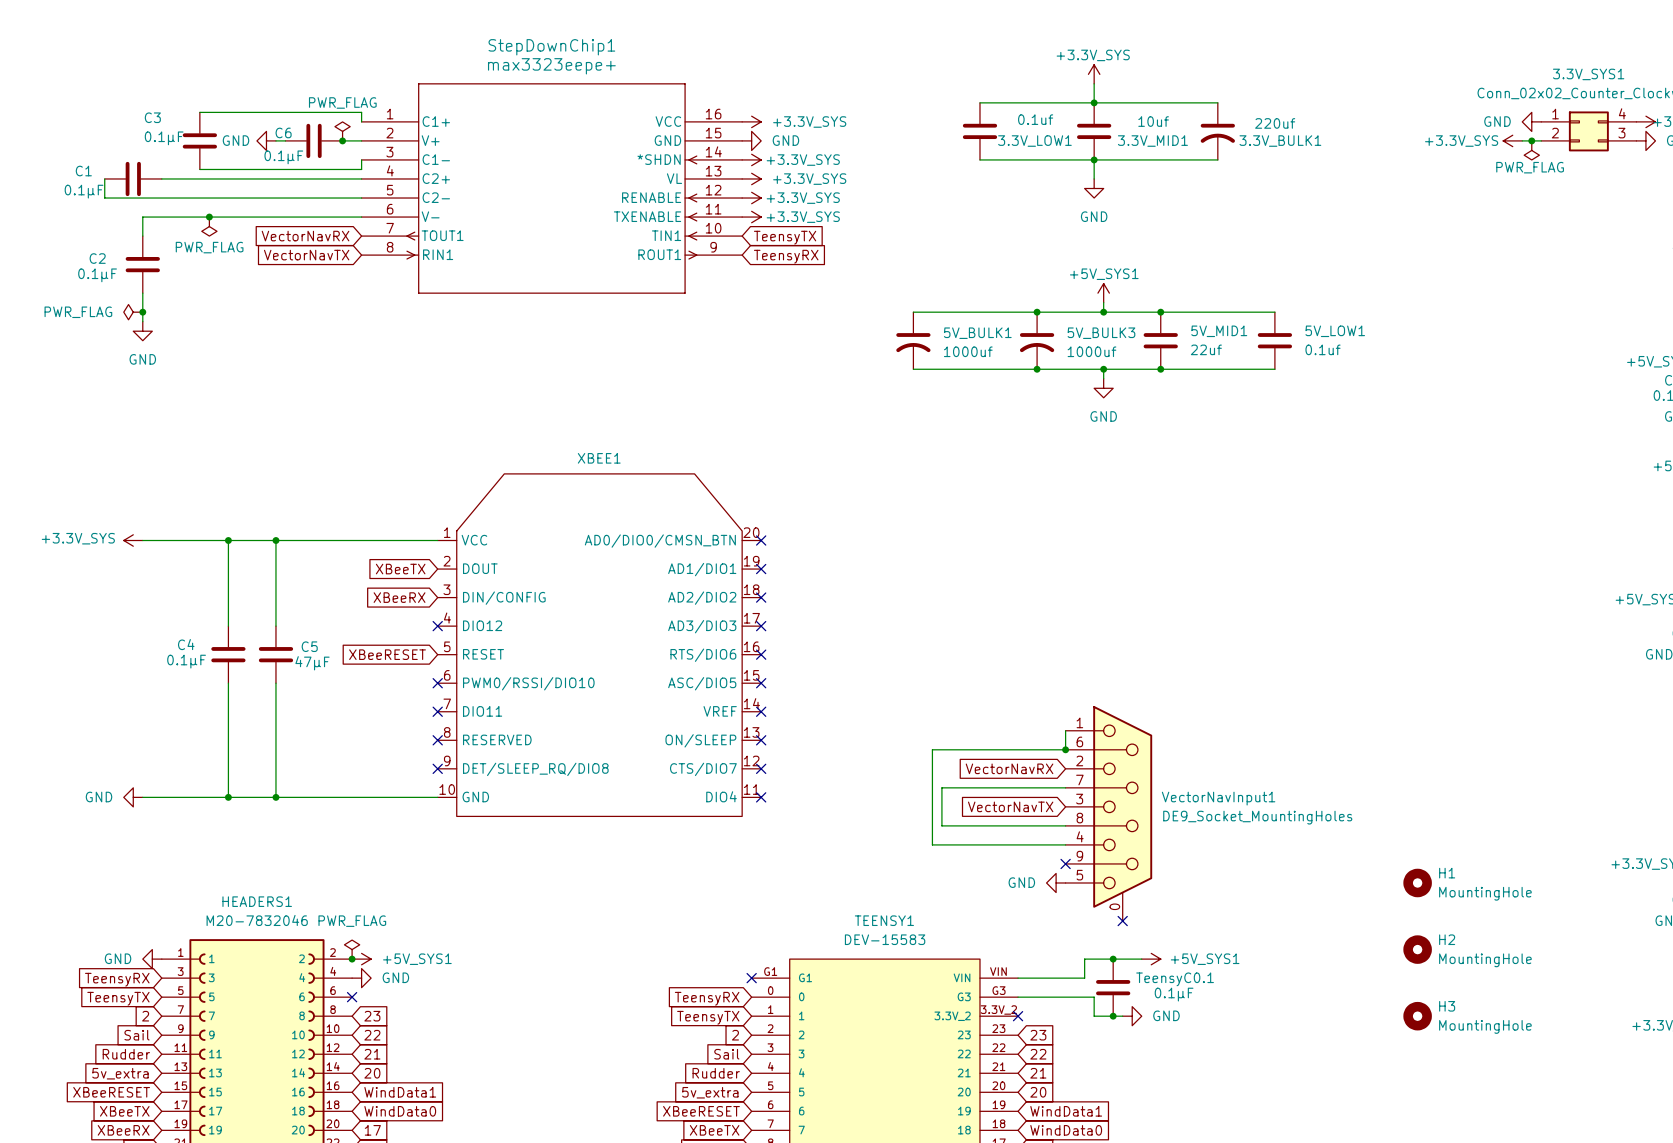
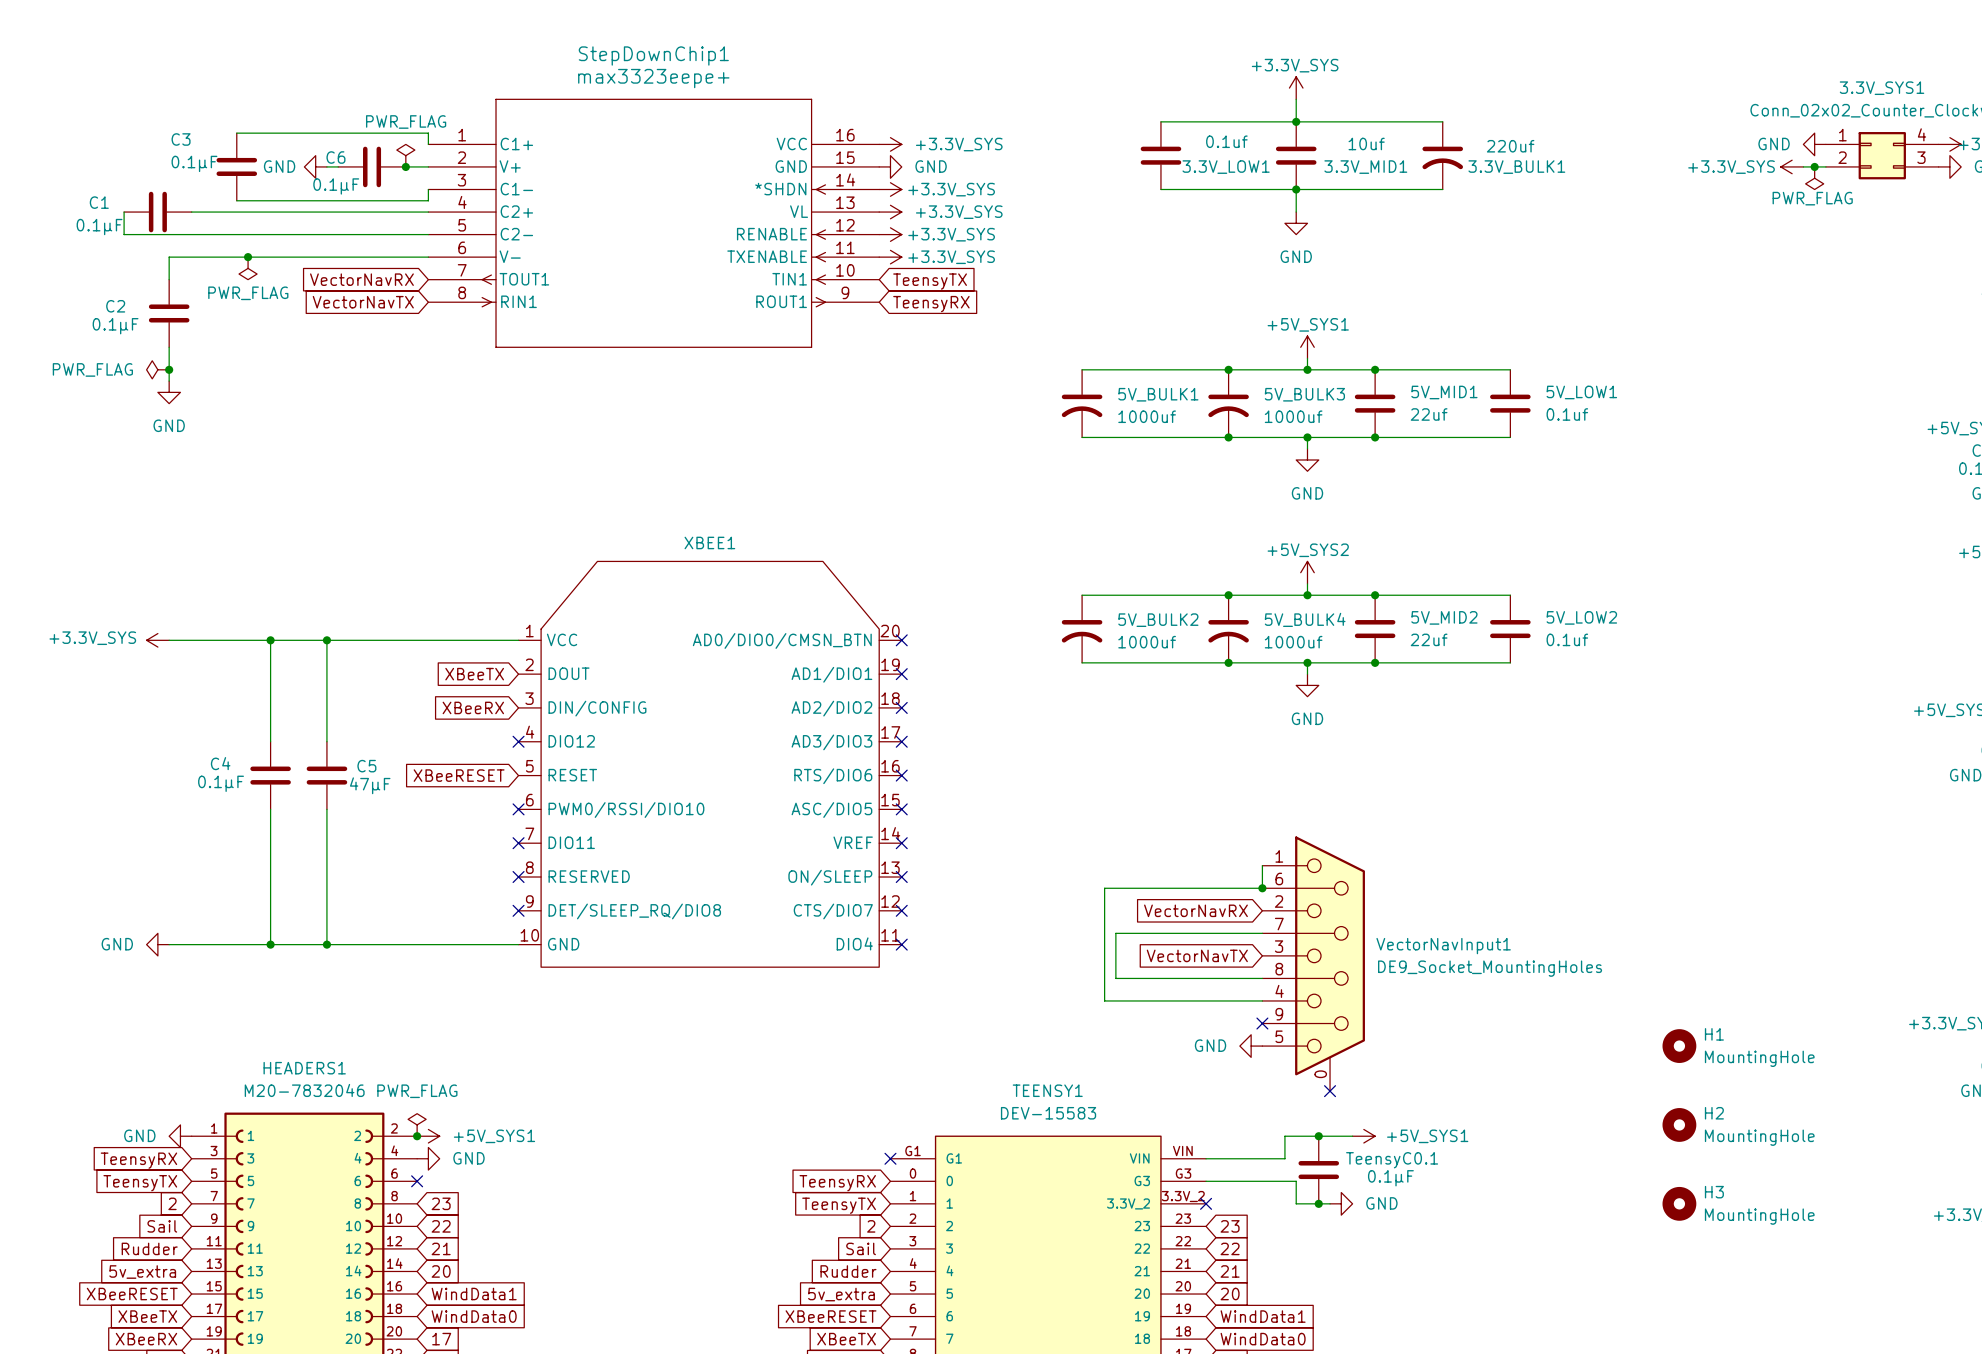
power symbol: none -> +5V_SYS2 (1307, 572)
wire: none -> (1307, 583) (1307, 595)
wire: none -> (1082, 595) (1510, 595)
junction: none -> (1228, 595)
junction: none -> (1307, 595)
junction: none -> (1375, 595)
5V_BULK2: none -> 1000uf (1082, 629)
5V_BULK4: none -> 1000uf (1228, 629)
5V_MID2: none -> 22uf (1375, 629)
5V_LOW2: none -> 0.1uf (1510, 629)
wire: none -> (1082, 662) (1510, 662)
junction: none -> (1228, 662)
wire: none -> (1307, 662) (1307, 674)
junction: none -> (1307, 662)
junction: none -> (1375, 662)
power symbol: none -> GND (1307, 685)

